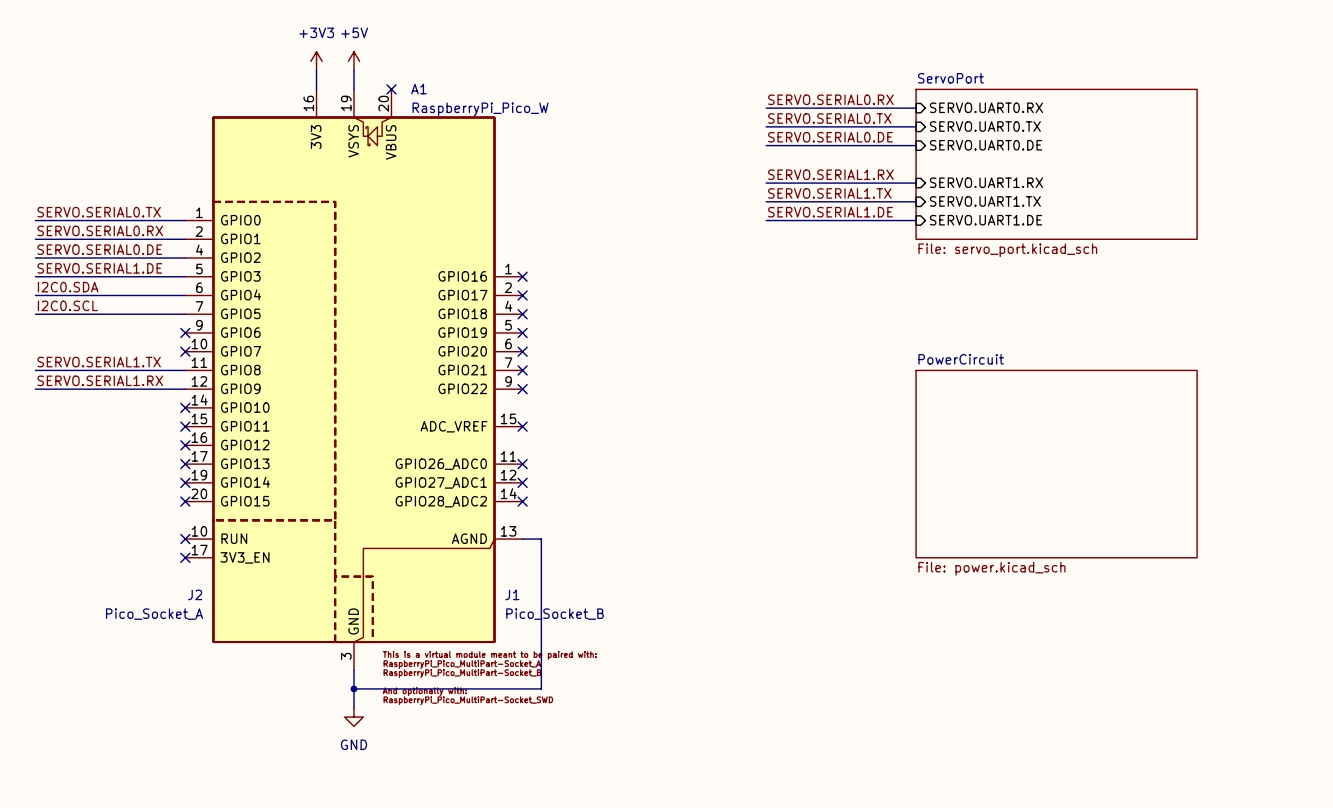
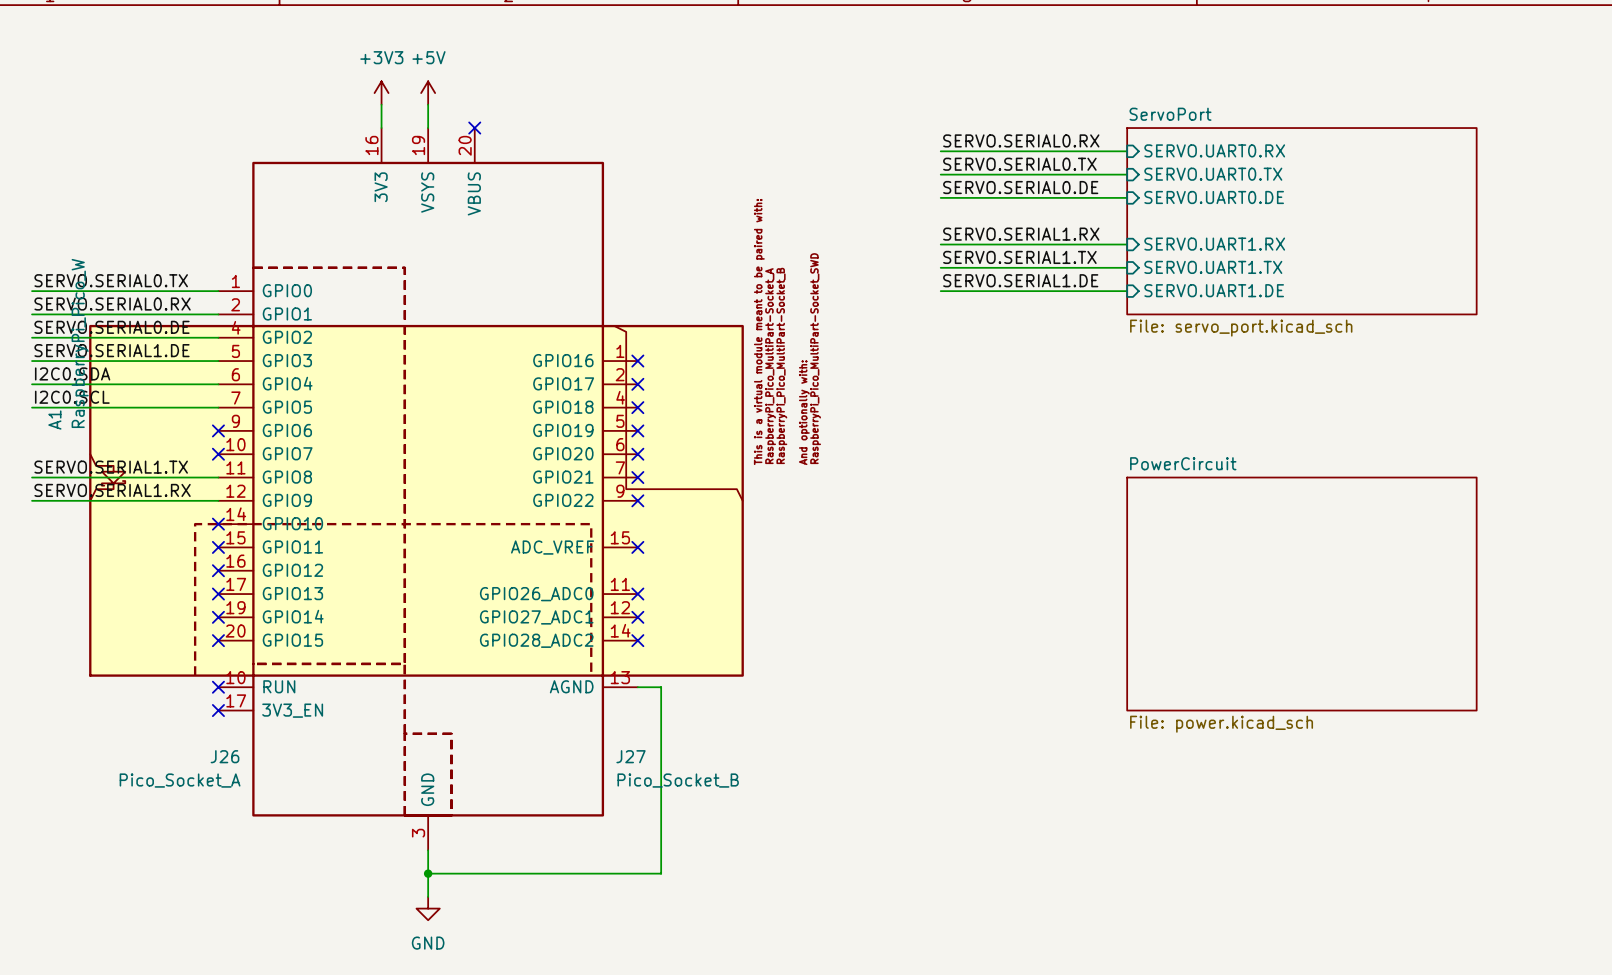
A1 rotation: 0° (353, 379) -> 90° counterclockwise (416, 500)
J2 name: J2 (195, 594) -> J26 (225, 756)
J1 name: J1 (512, 594) -> J27 (631, 756)

